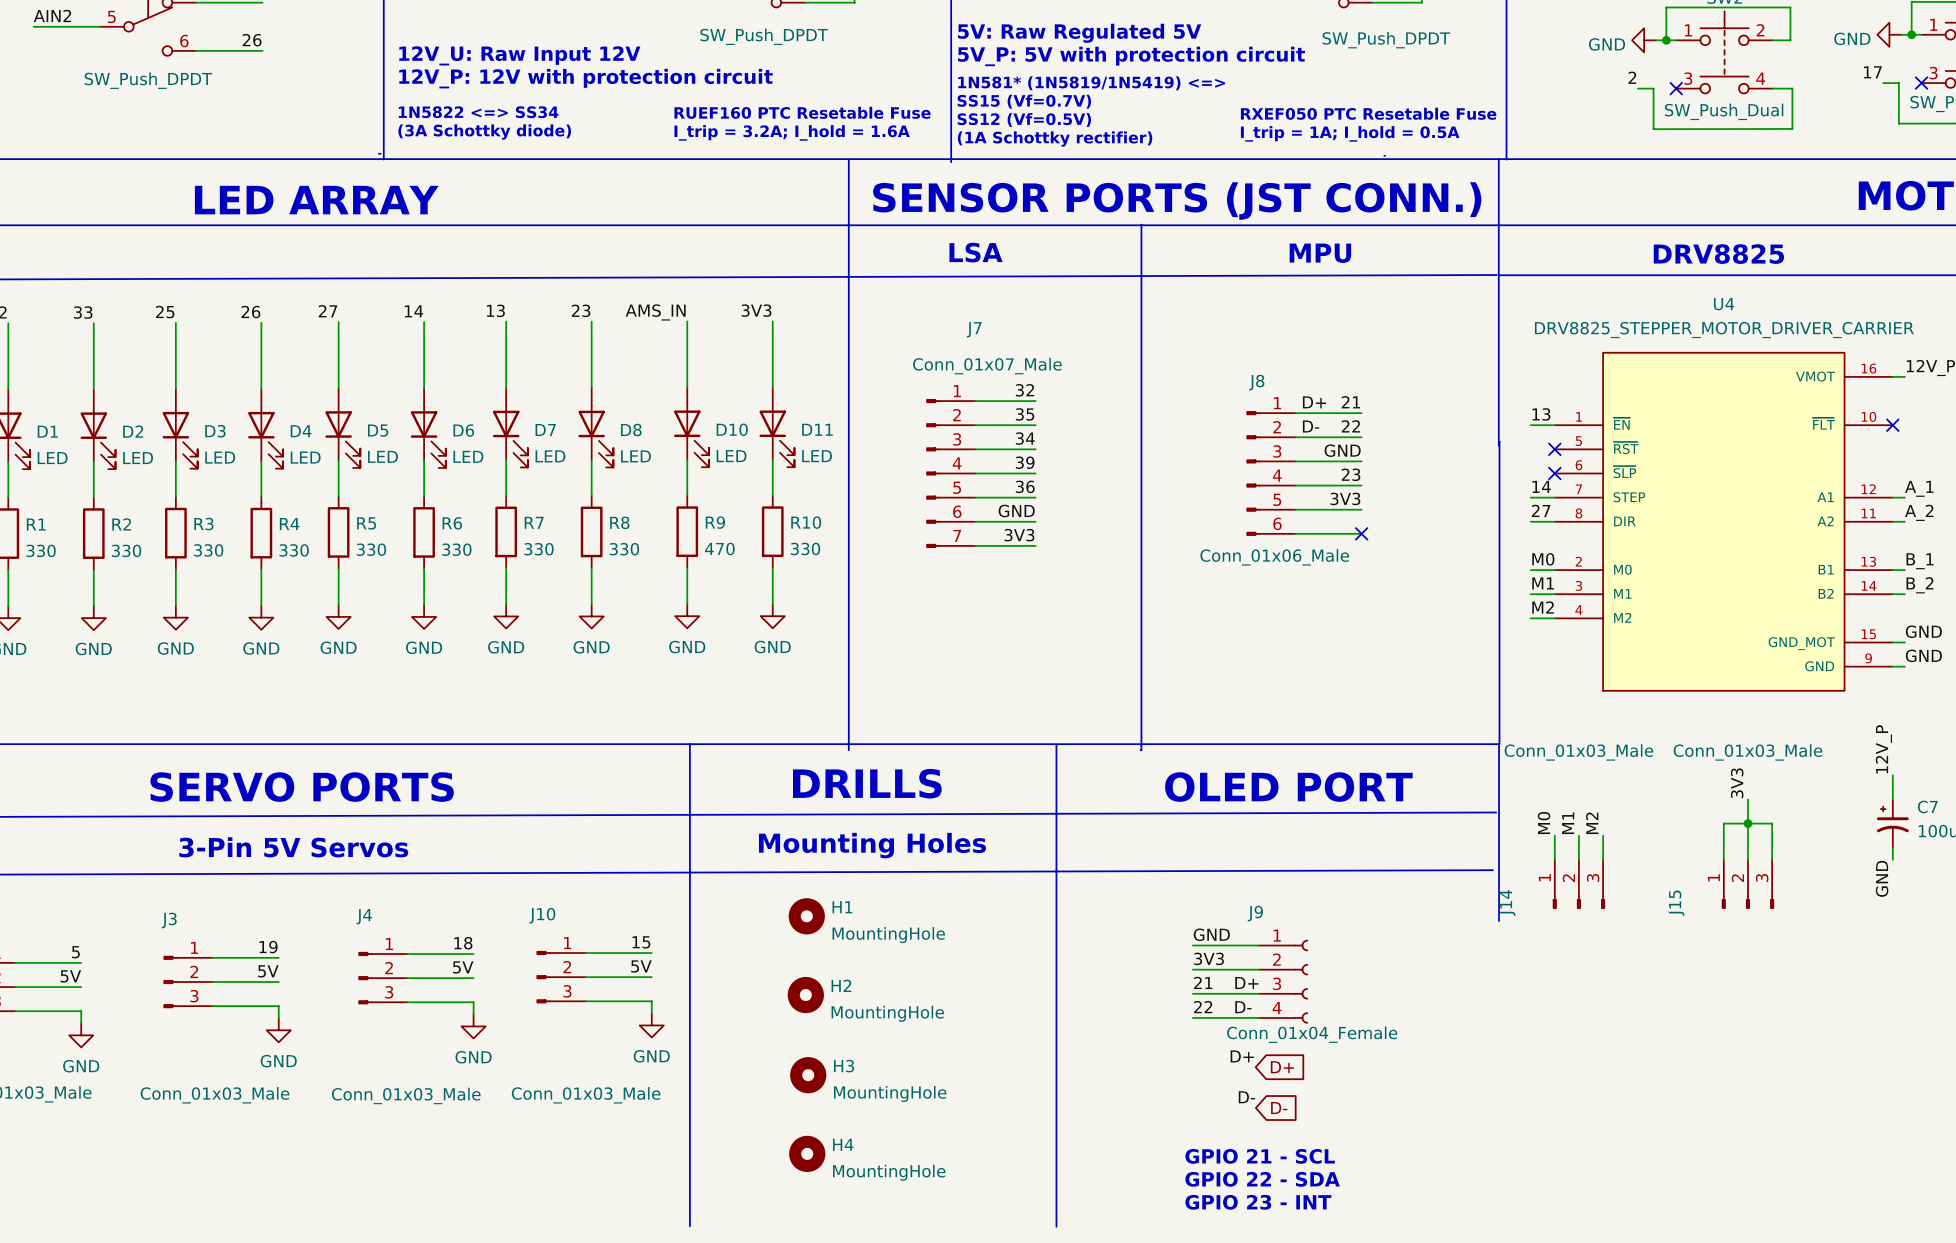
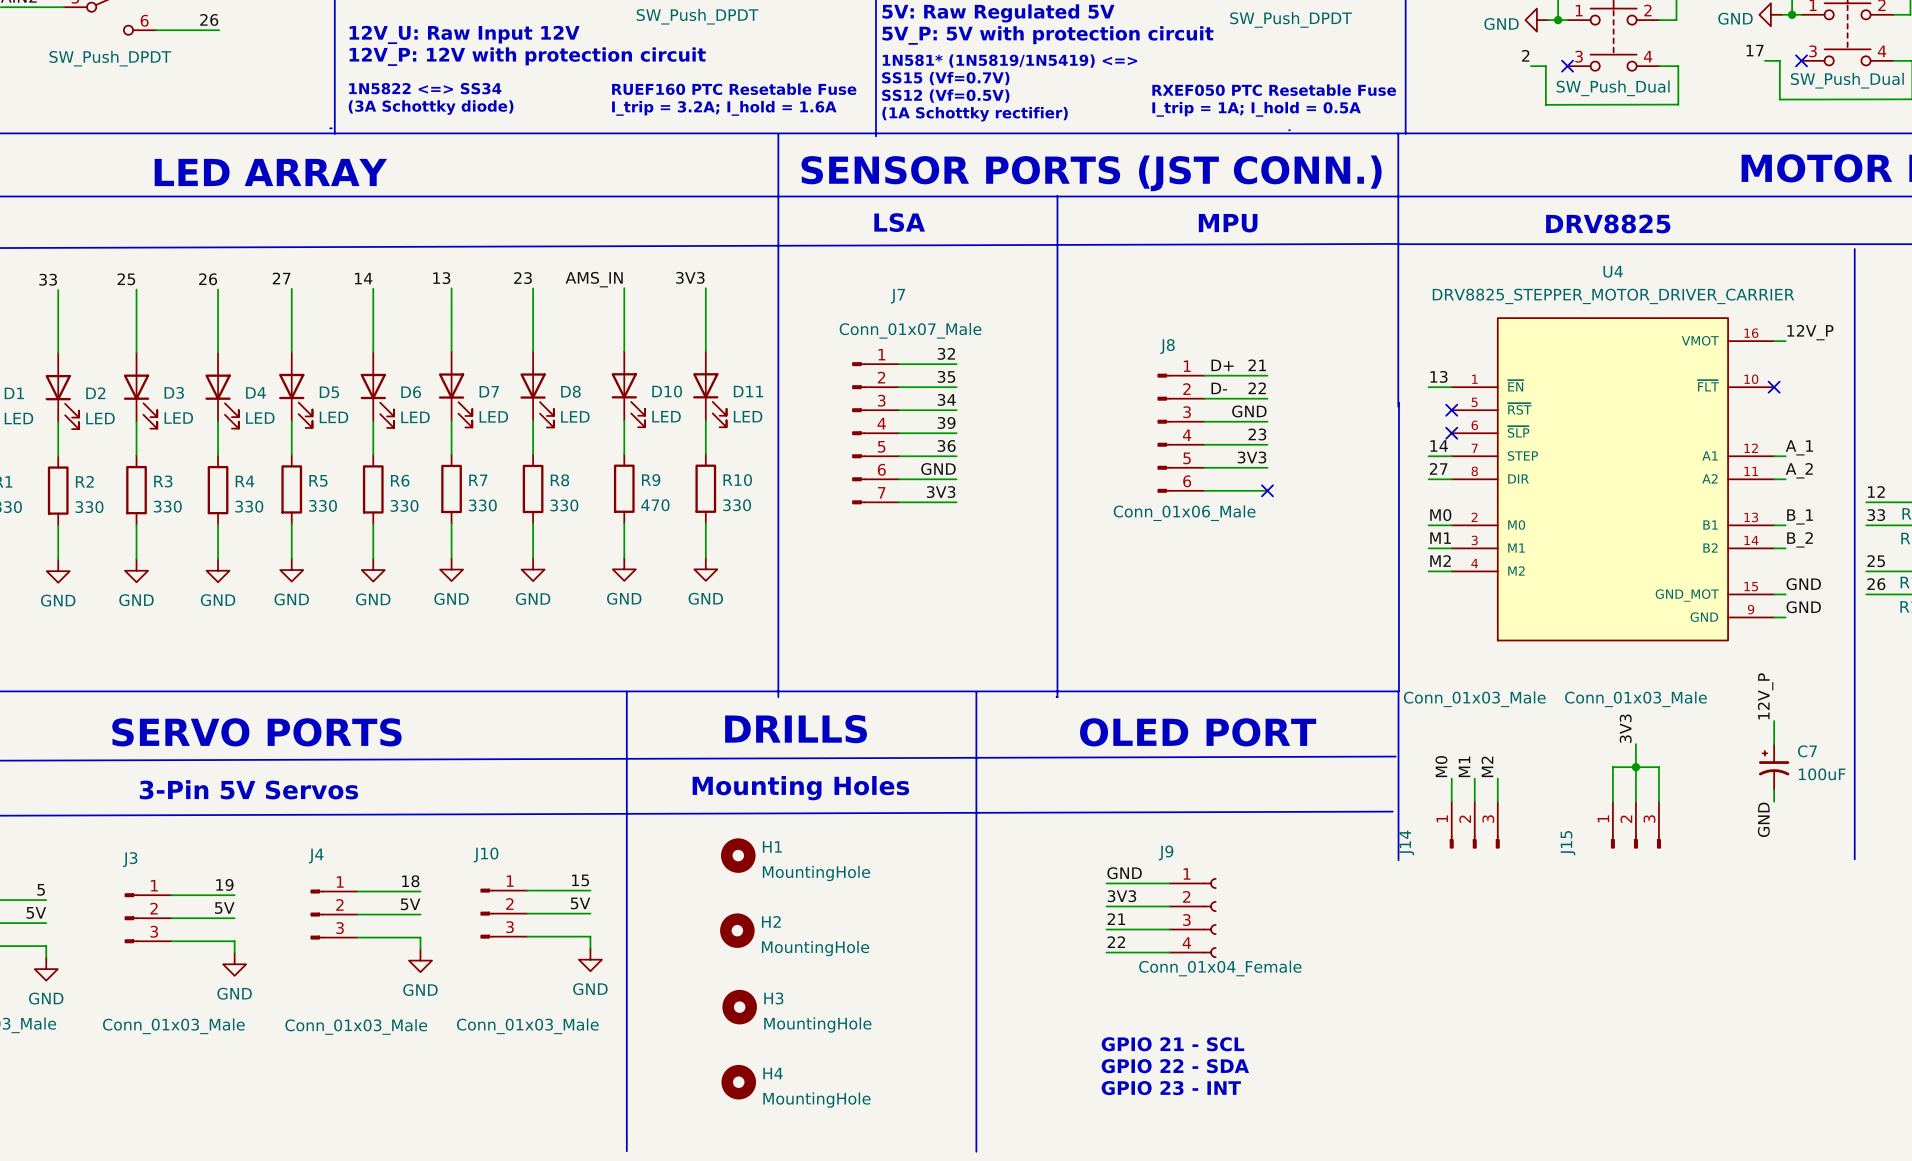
label: D+ (1246, 983) -> none
label: D- (1243, 1007) -> none
label: D+ (1242, 1056) -> none
global label: D+ (1282, 1067) -> none
label: D- (1246, 1097) -> none
global label: D- (1279, 1108) -> none
text: none -> GPIO 21 - SCL (1172, 1044)
text: GPIO 21 - SCL (1260, 1156) -> GPIO 23 - INT (1171, 1088)
text position: GPIO 22 - SDA (1262, 1179) -> GPIO 22 - SDA (1175, 1066)
text: GPIO 23 - INT (1258, 1202) -> none

